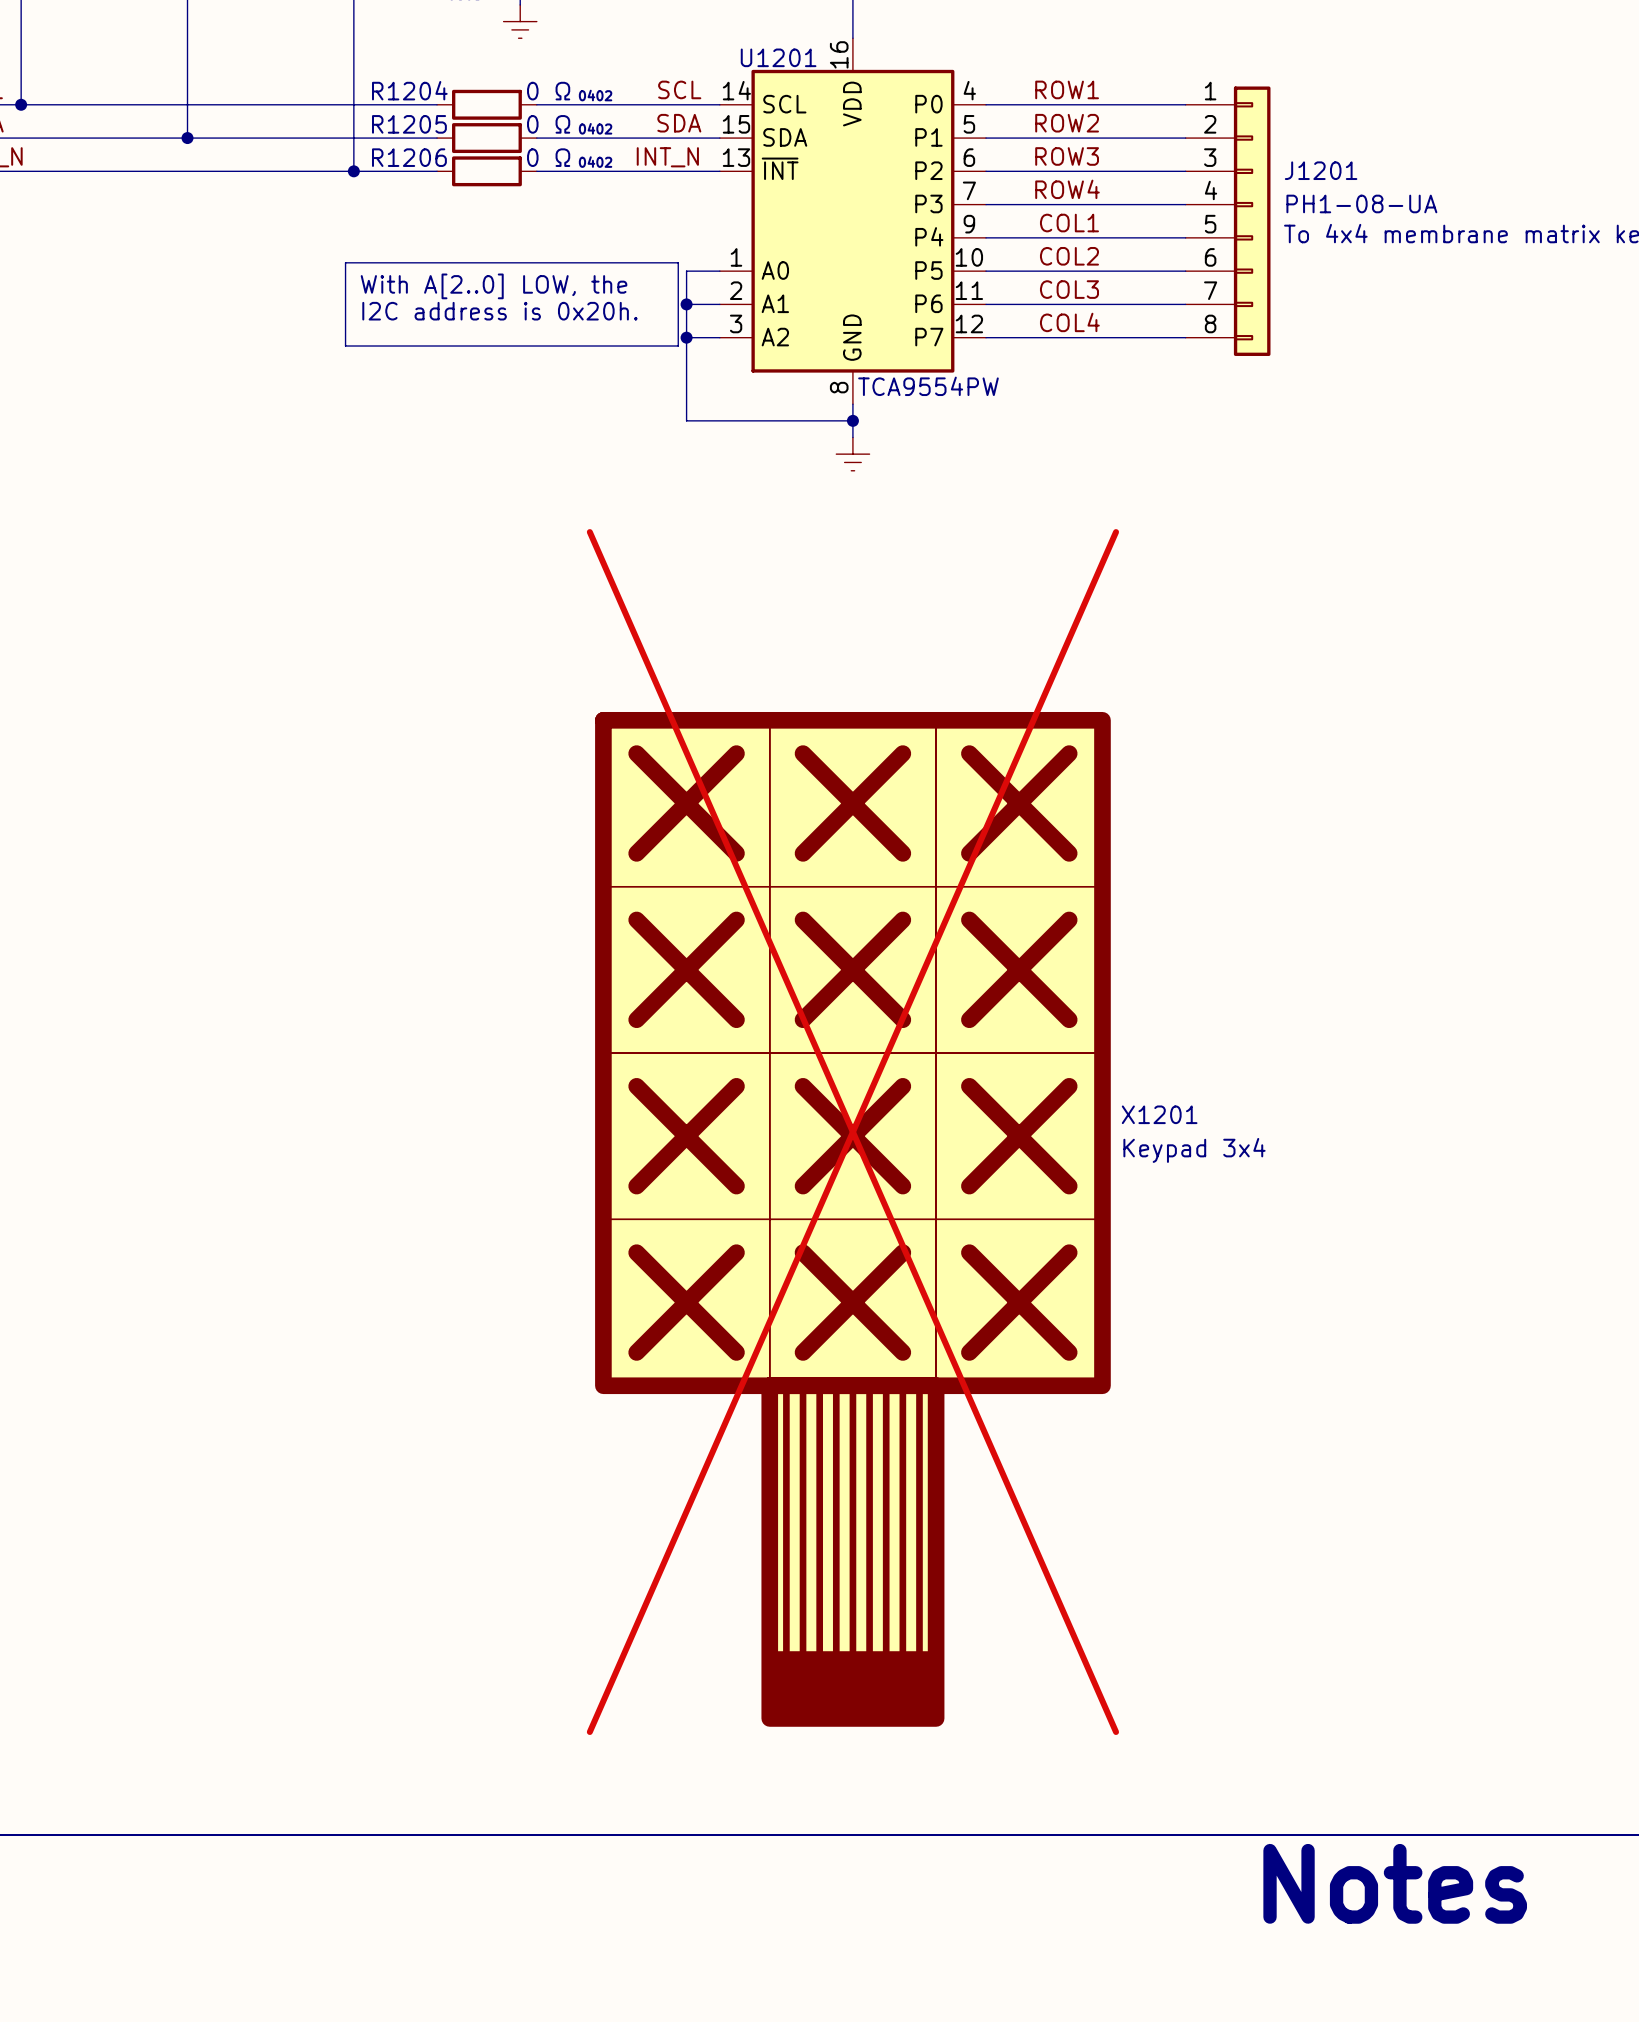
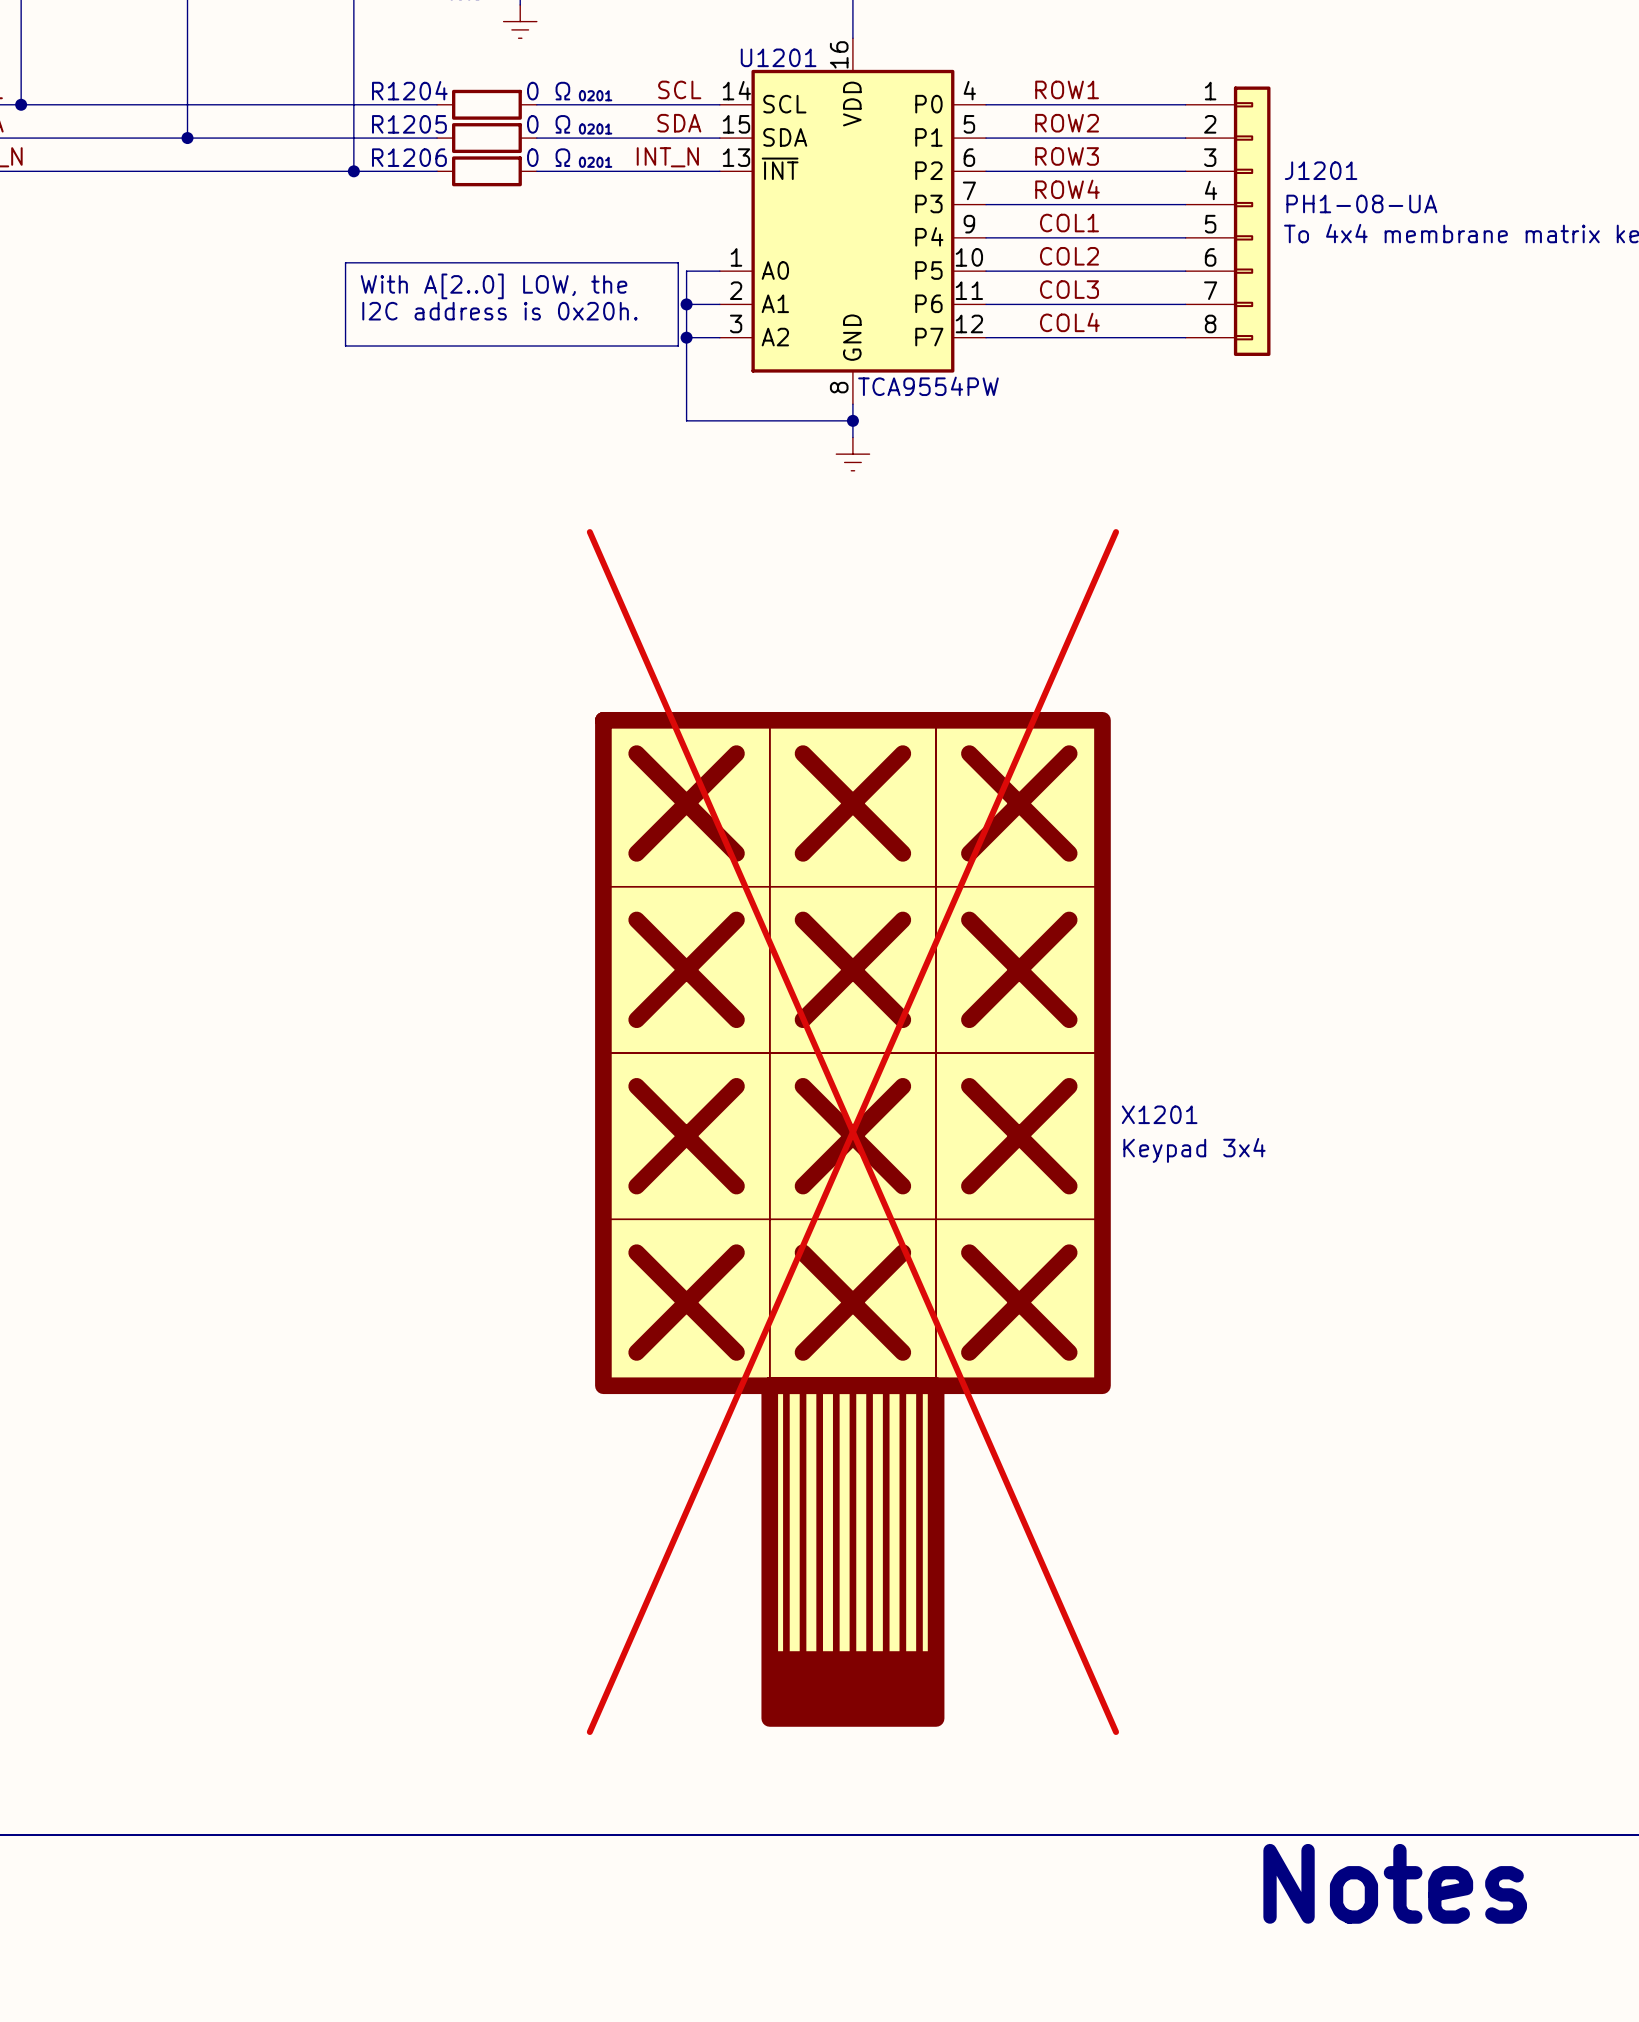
R1204 text: 0402 (595, 95) -> 0201 (595, 95)
R1205 text: 0402 (595, 128) -> 0201 (595, 129)
R1206 text: 0402 (595, 162) -> 0201 (595, 162)

